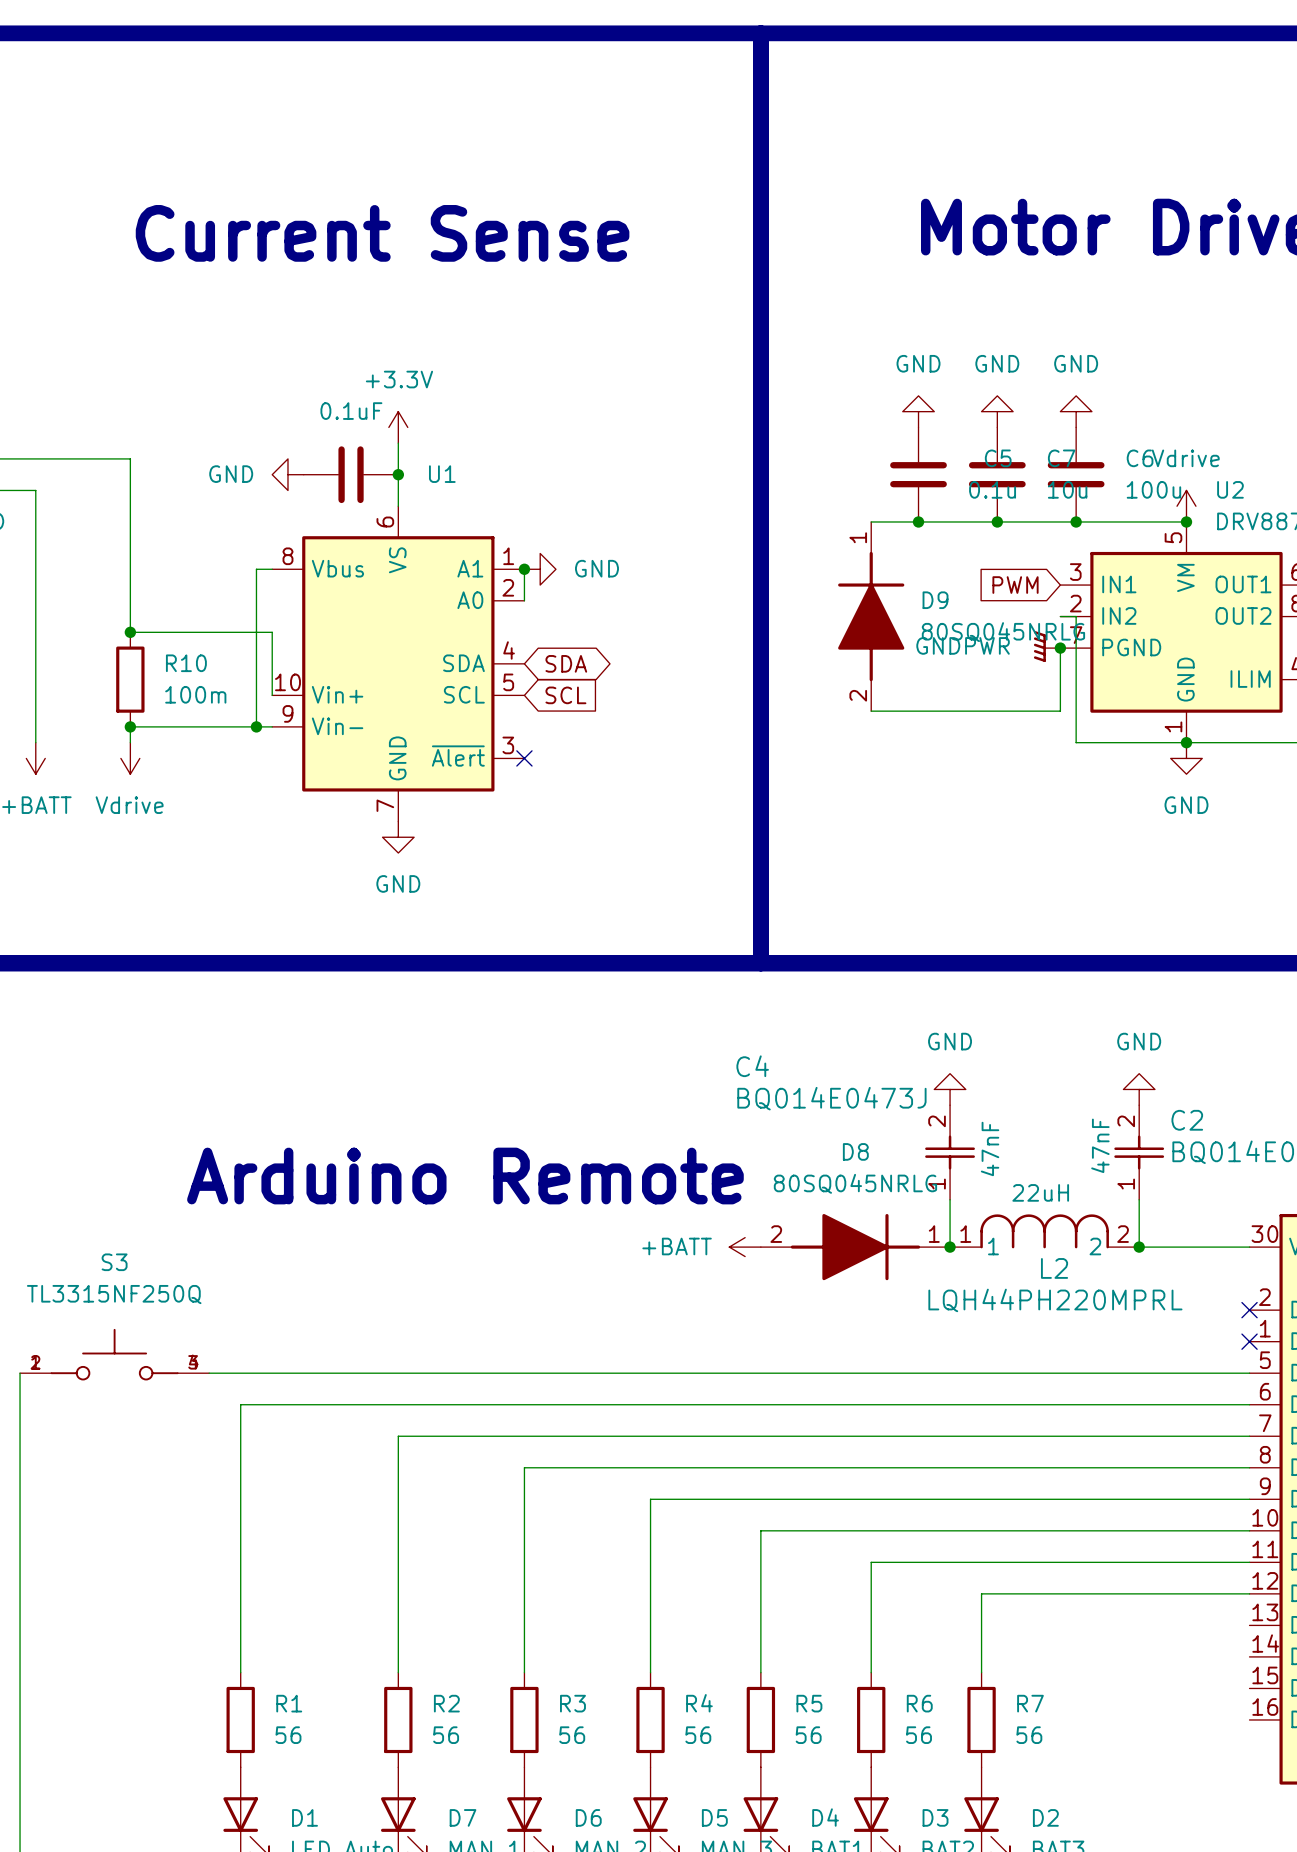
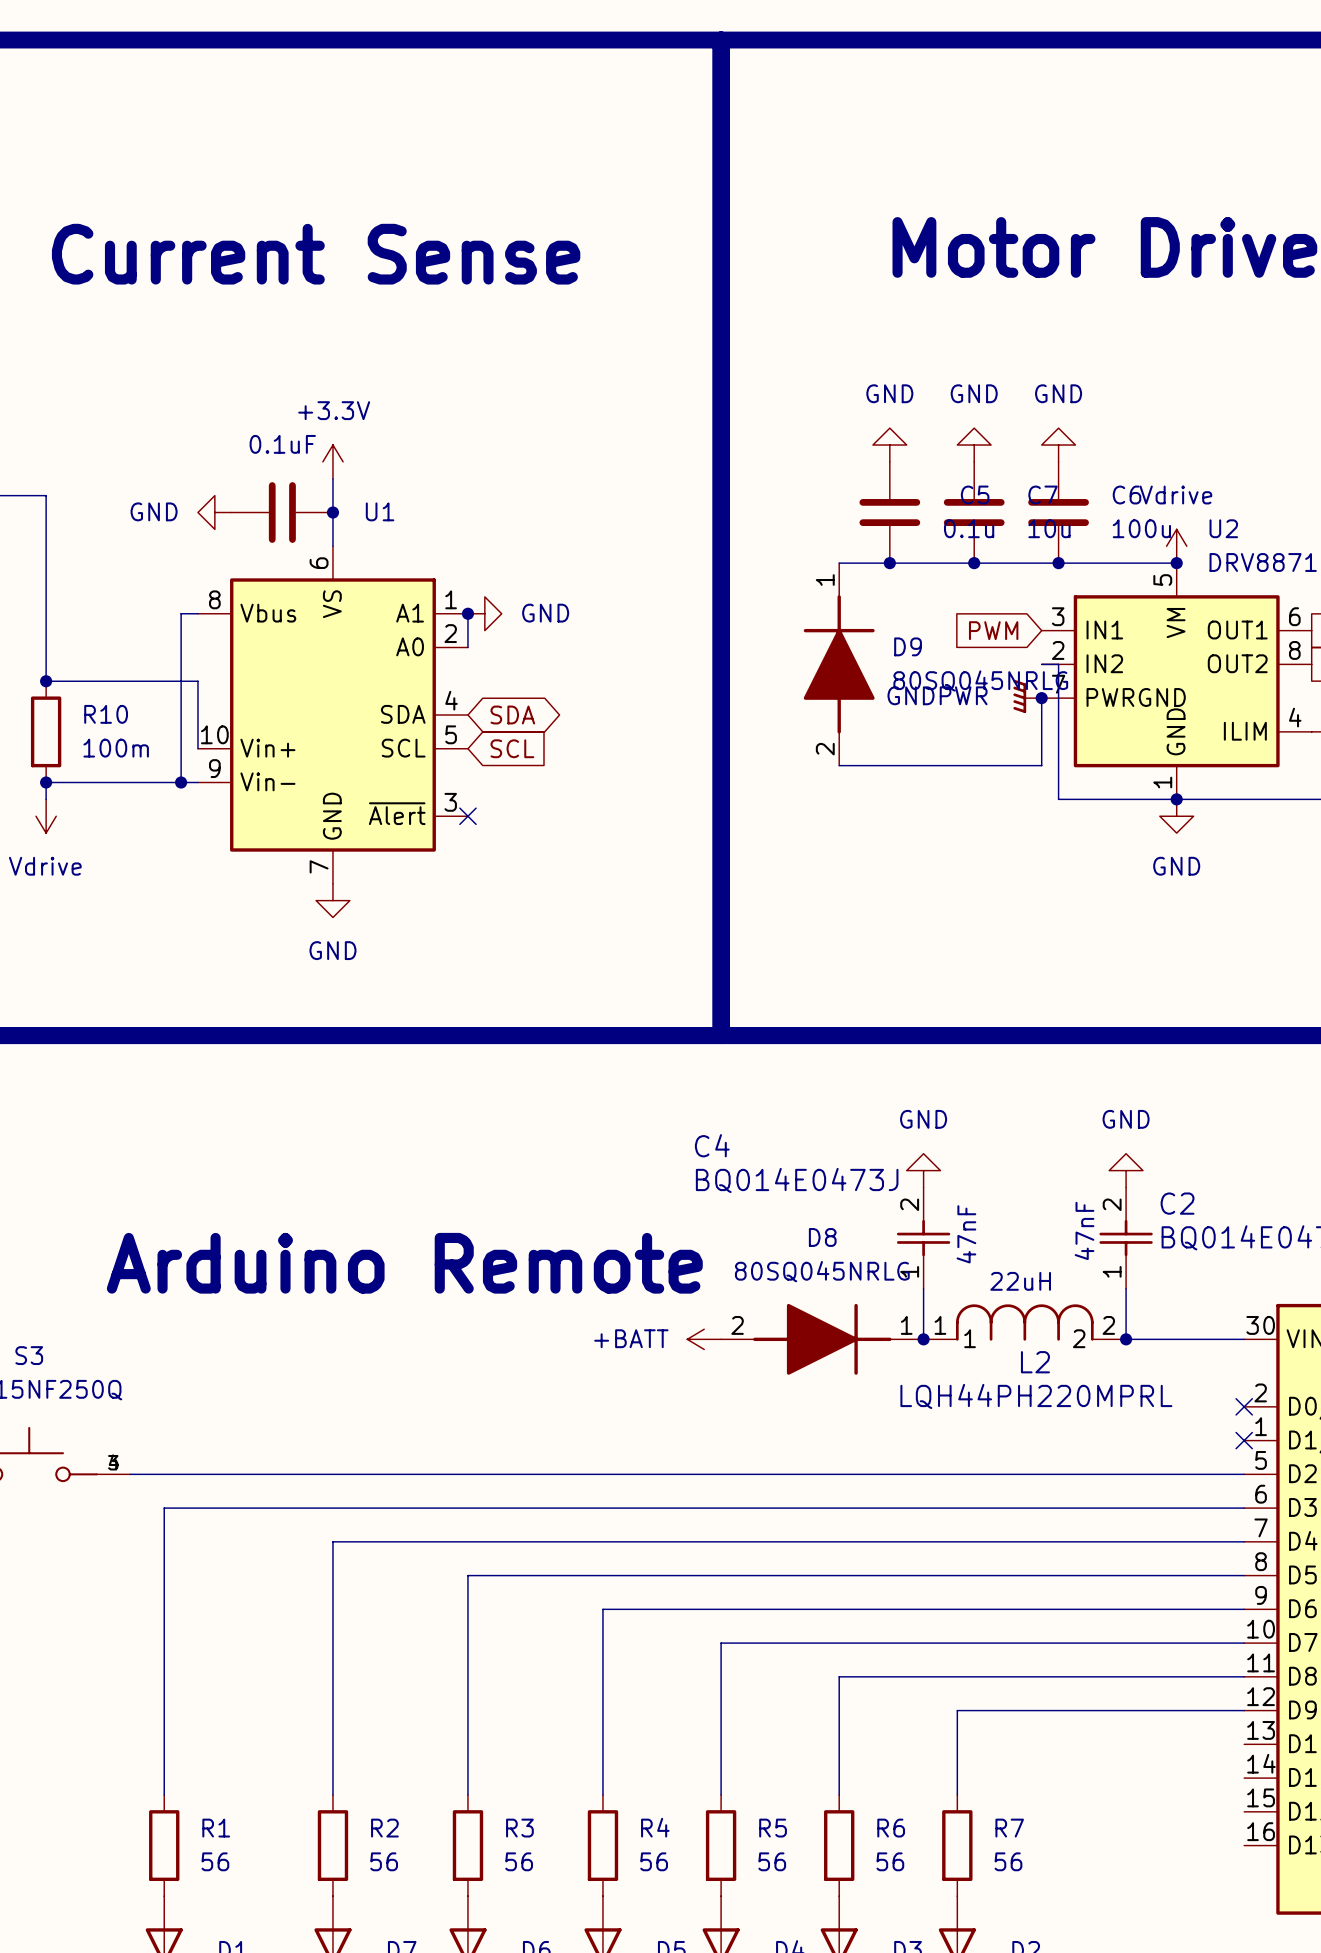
U2 pin name: PGND (1131, 647) -> PWRGND (1136, 697)

